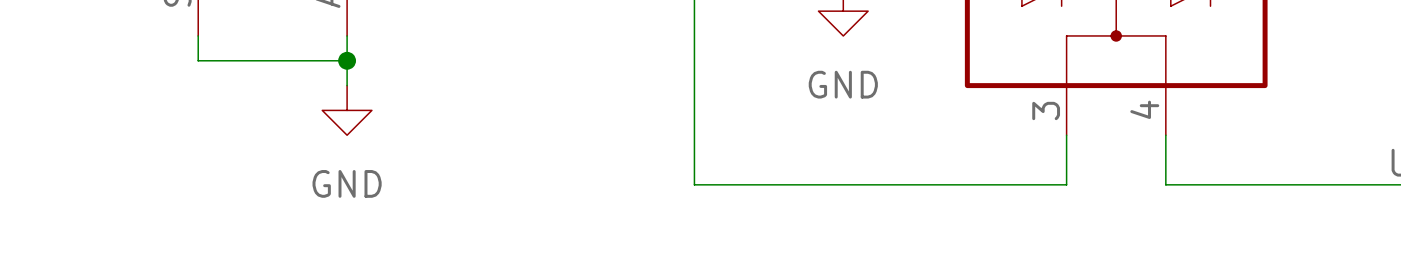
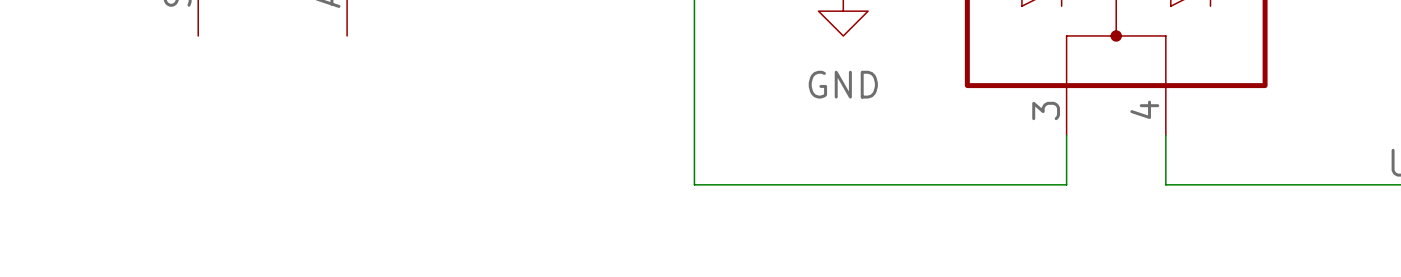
wire: (198, 35) (198, 60) (347, 60) -> none
wire: (347, 35) (347, 85) -> none
junction: (347, 60) -> none
power symbol: GND (347, 110) -> none

